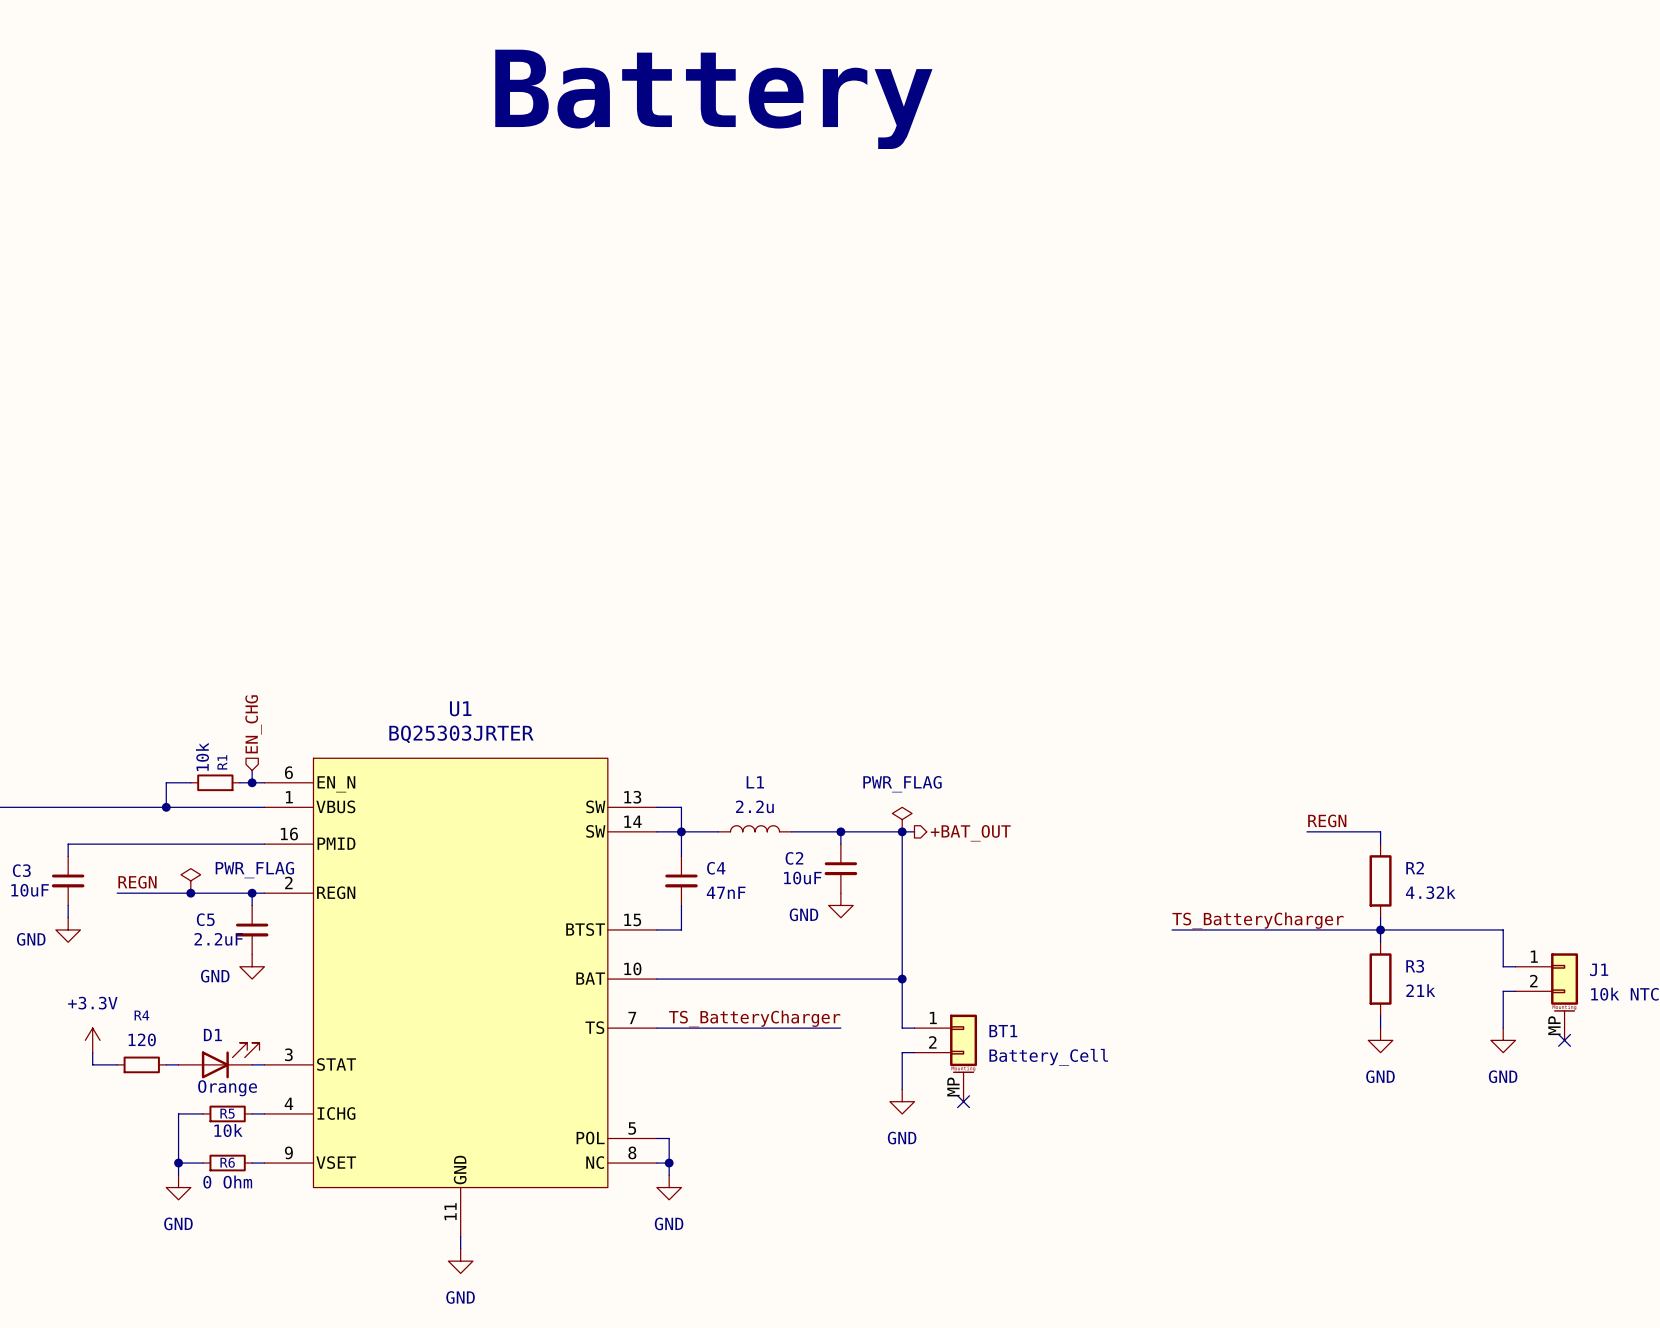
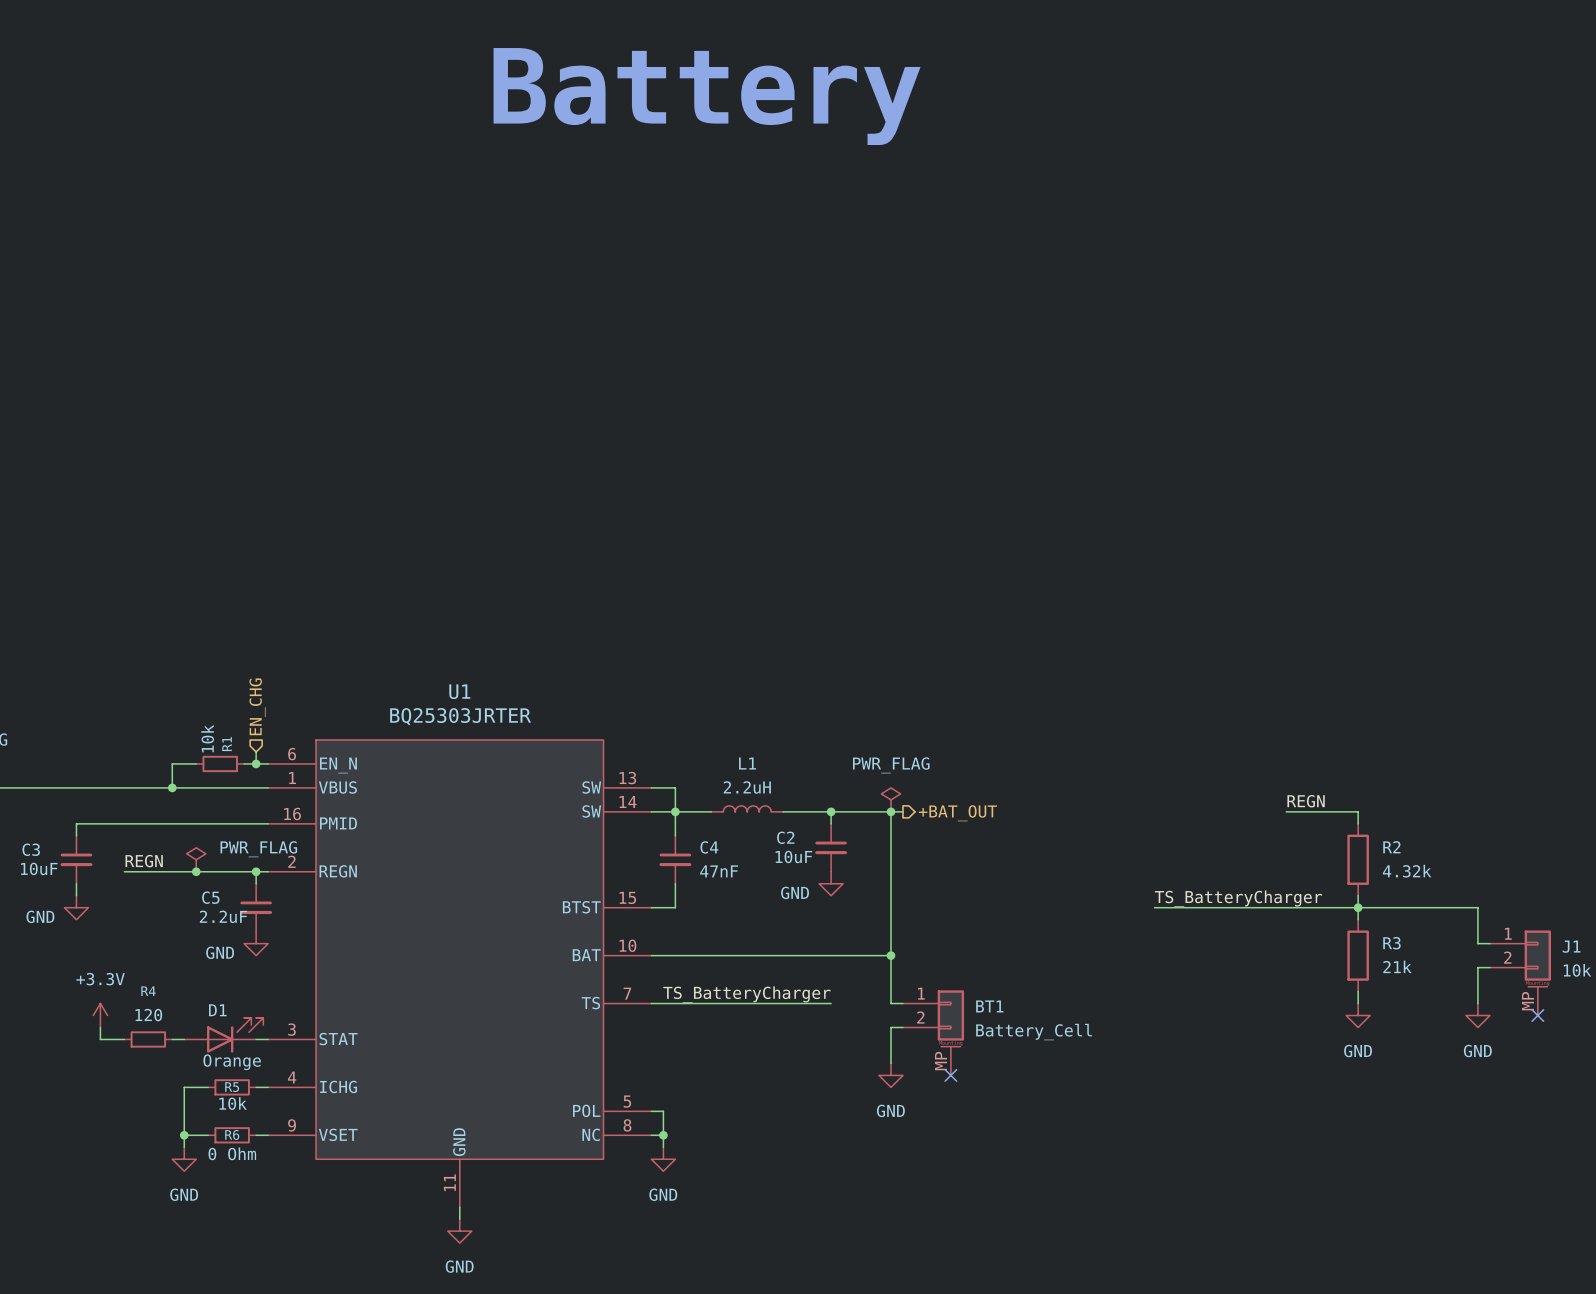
L1 value: 2.2u (754, 806) -> 2.2uH (747, 787)

